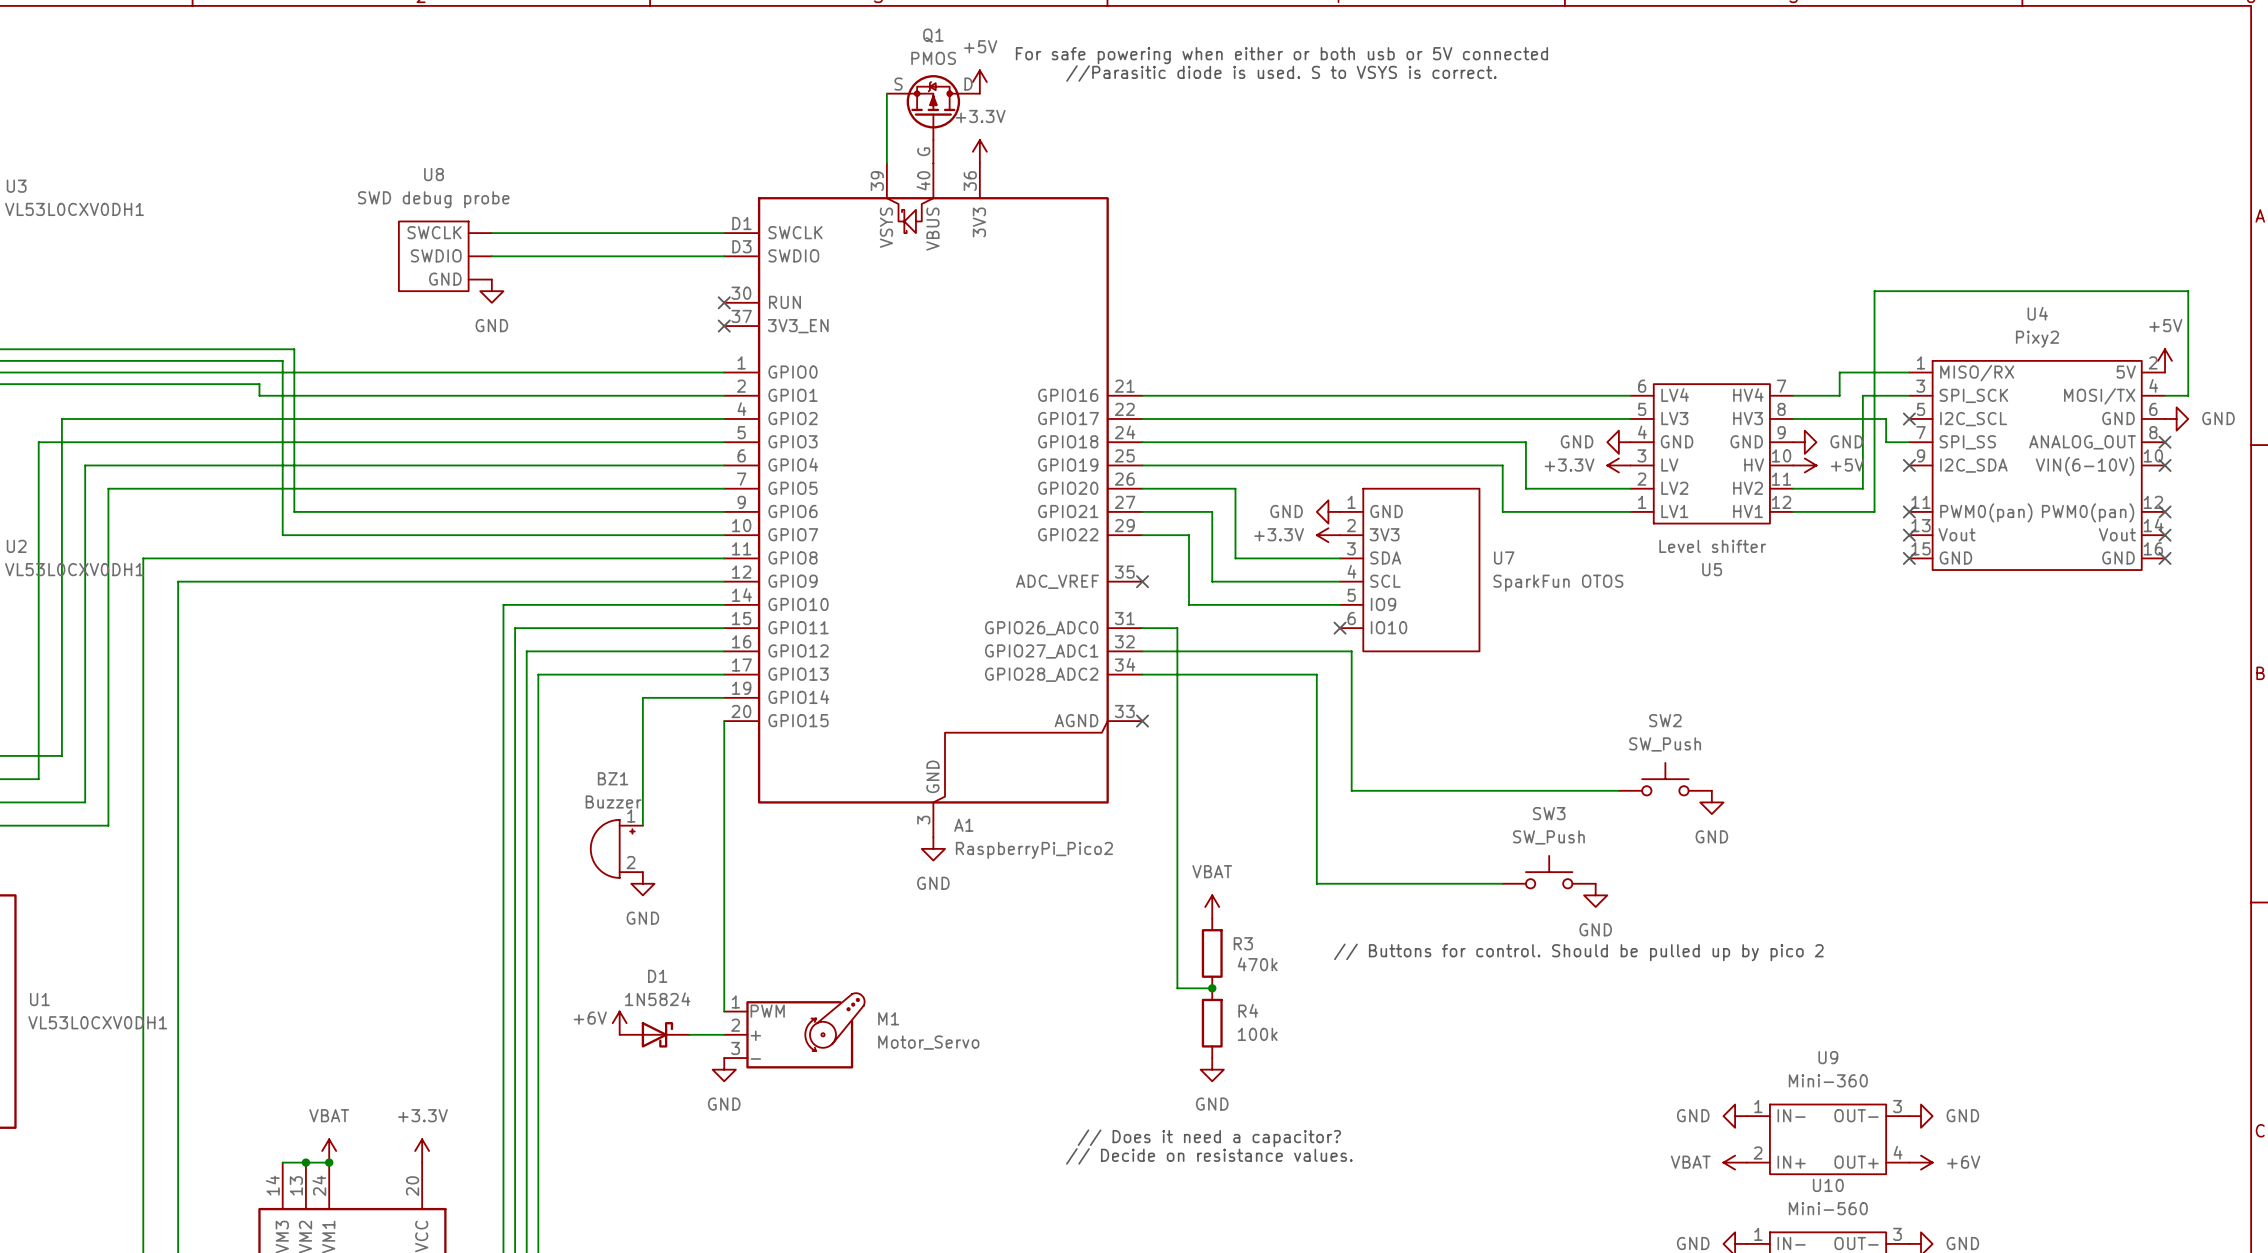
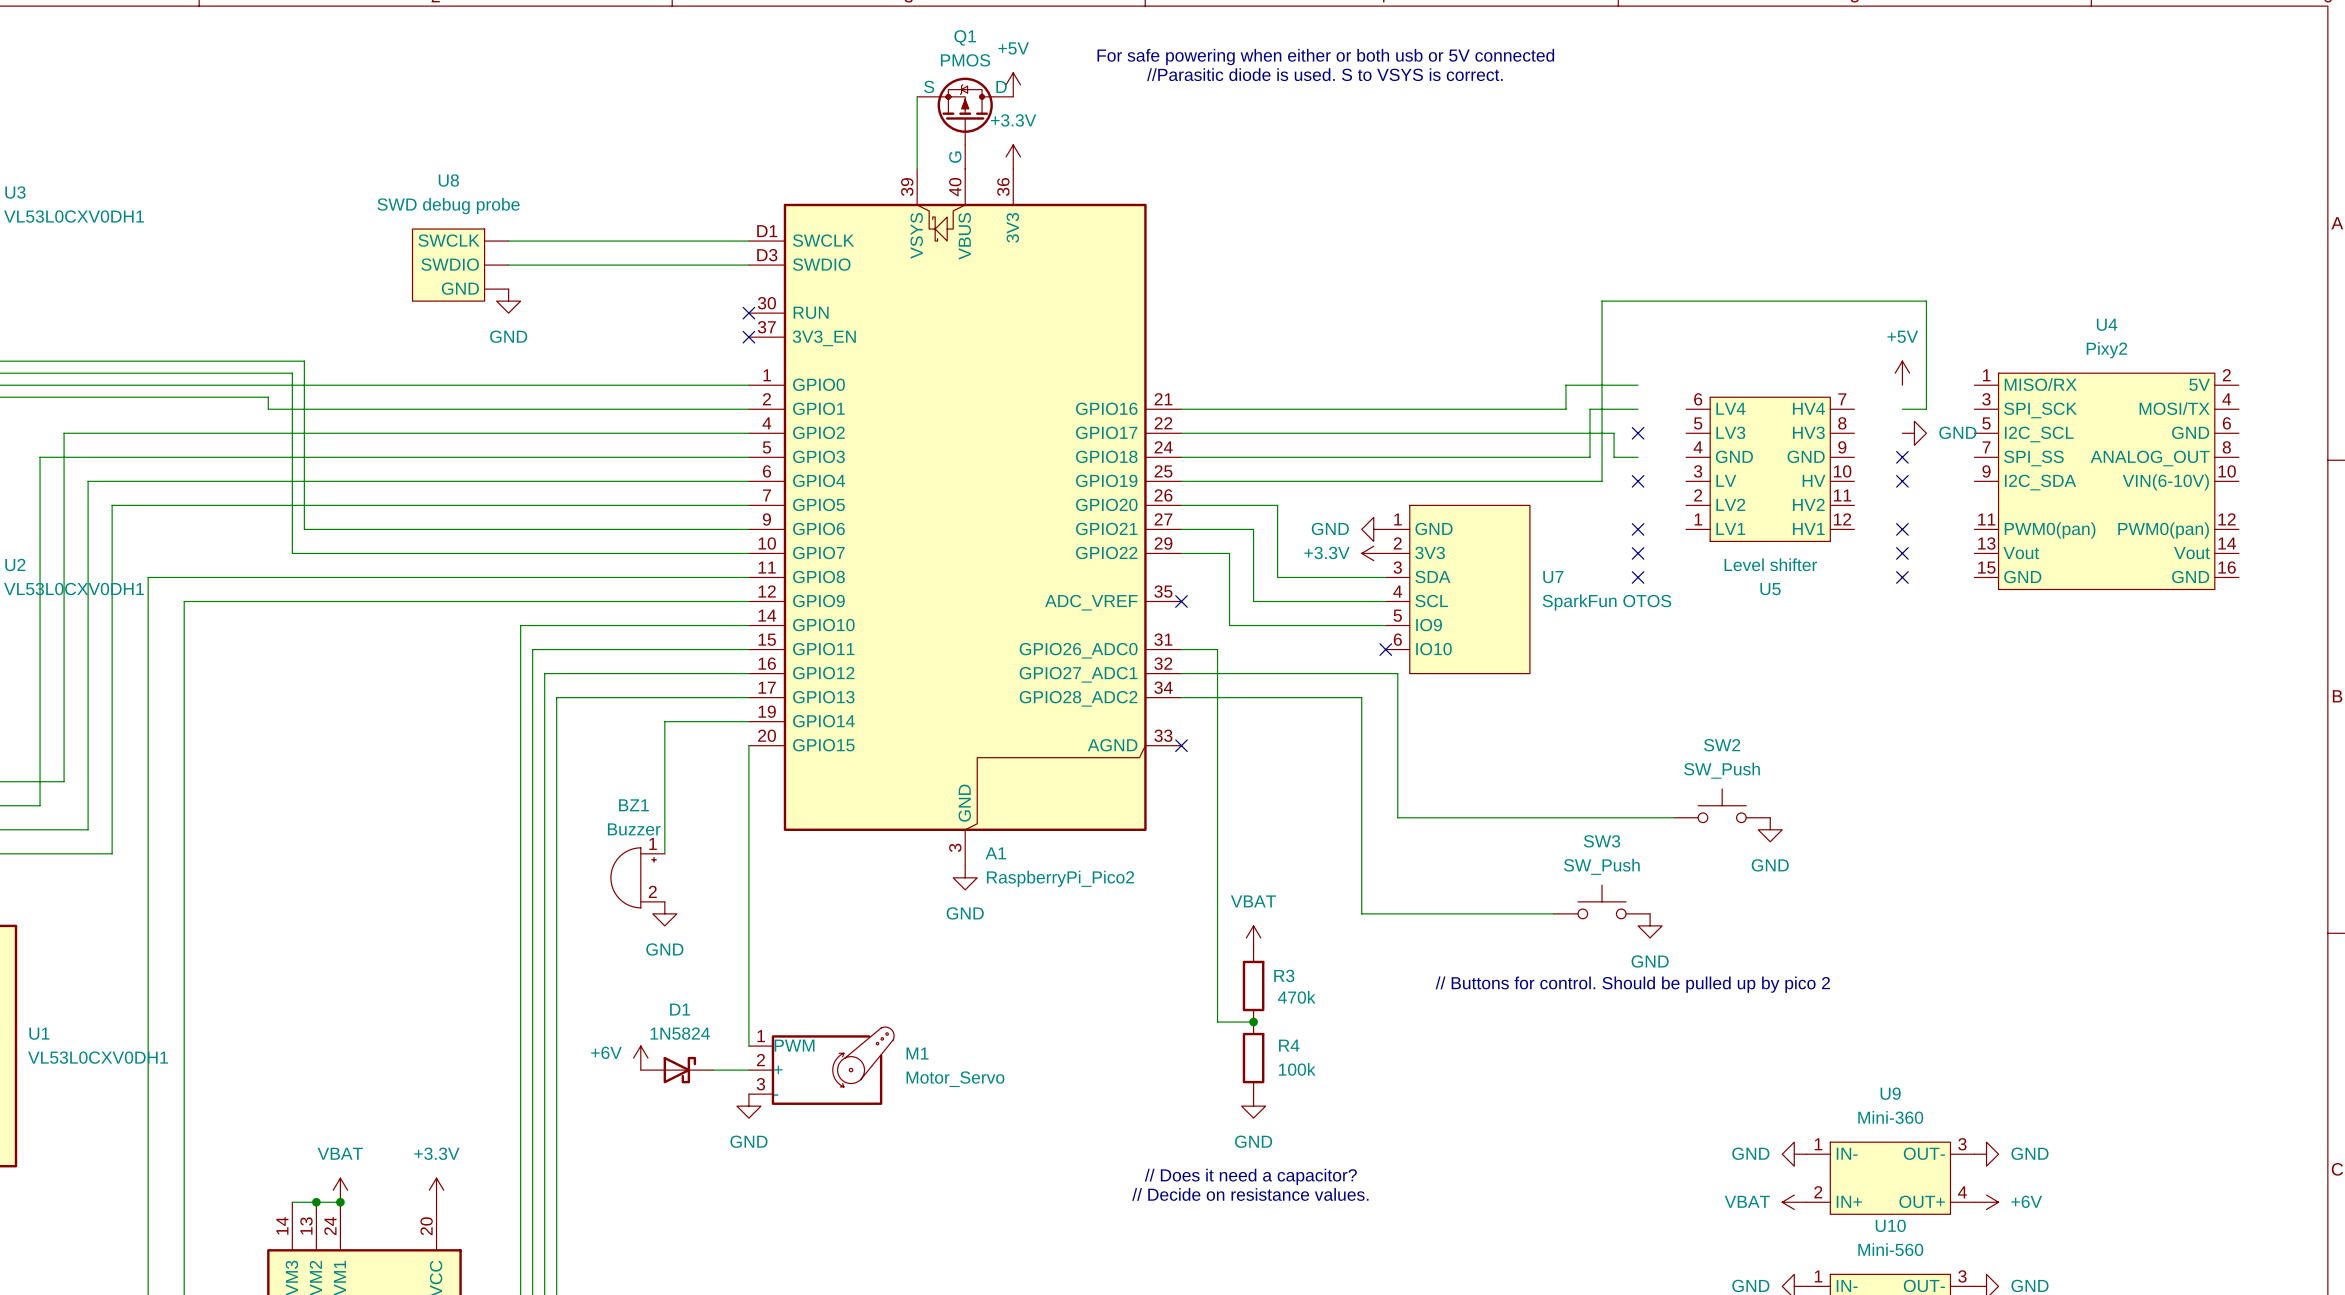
power symbol: +5V (2165, 360) -> none
wire: none -> (1638, 385) (1565, 385) (1565, 409)
wire: (1909, 372) (1839, 372) (1839, 395) (1793, 395) -> none
wire: (1514, 395) (1537, 395) -> (1577, 457) (1590, 457) (1590, 409)
wire: (1584, 395) (1630, 395) -> none
wire: (1909, 395) (1862, 395) (1862, 488) (1793, 488) -> none
wire: (2165, 395) (2188, 395) (2188, 291) (1874, 291) (1874, 511) (1793, 511) -> none
wire: (1560, 418) (1630, 418) -> (1614, 433) (1614, 457) (1638, 457)
no-connect mark: none -> (1638, 433)
wire: (1793, 418) (1886, 418) (1886, 442) (1909, 442) -> none
no-connect mark: (1909, 418) -> none
power symbol: GND (2176, 418) -> none
wire: (1525, 442) (1525, 488) (1630, 488) -> none
power symbol: GND (1618, 442) -> none
power symbol position: GND (1804, 442) -> GND (1914, 433)
no-connect mark: none -> (1902, 457)
no-connect mark: (2165, 442) -> none
wire: (1502, 465) (1502, 511) (1630, 511) -> (1553, 481) (1602, 481) (1602, 301) (1926, 301) (1926, 409) (1902, 409)
no-connect mark: none -> (1638, 481)
power symbol: +3.3V (1618, 465) -> none
power symbol rotation: 0° (1804, 465) -> 90° counterclockwise (1902, 373)
power symbol position: +5V (1804, 465) -> +5V (1902, 373)
no-connect mark: none -> (1902, 481)
no-connect mark: (1909, 465) -> none
no-connect mark: (2165, 465) -> none
no-connect mark: none -> (1638, 529)
no-connect mark: none -> (1902, 529)
no-connect mark: (1909, 511) -> none
no-connect mark: (2165, 511) -> none
no-connect mark: none -> (1638, 553)
no-connect mark: none -> (1902, 553)
no-connect mark: (1909, 535) -> none
no-connect mark: (2165, 535) -> none
no-connect mark: none -> (1638, 577)
no-connect mark: none -> (1902, 577)
no-connect mark: (1909, 558) -> none
no-connect mark: (2165, 558) -> none

